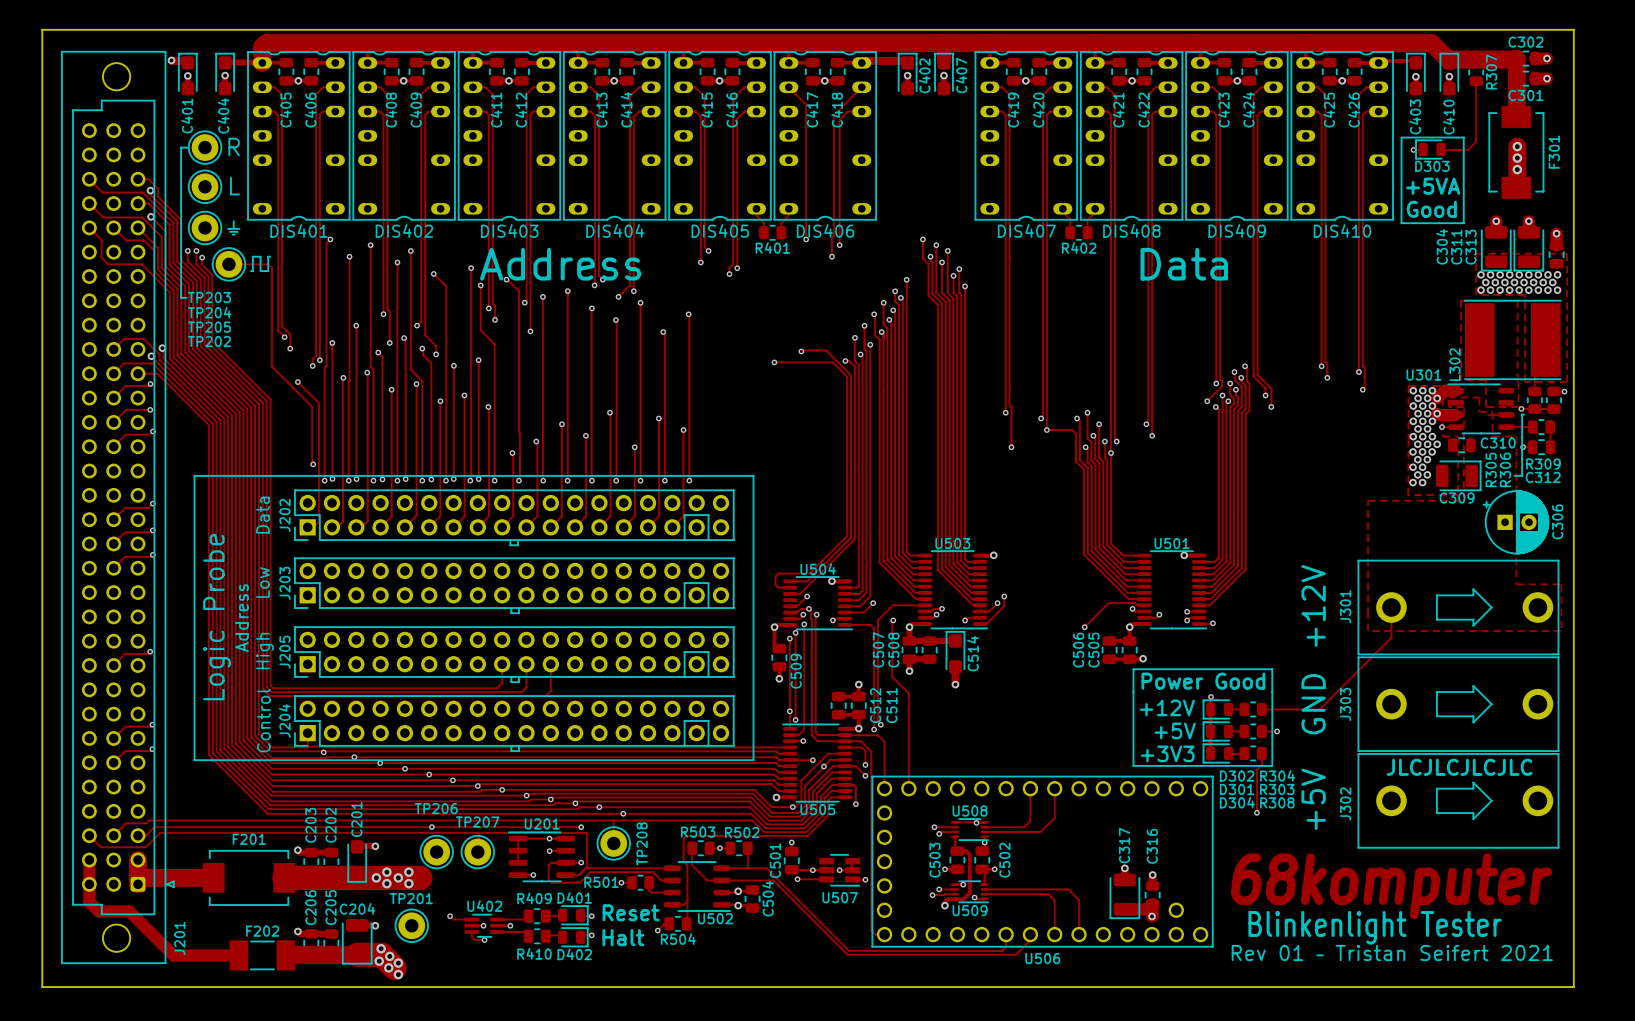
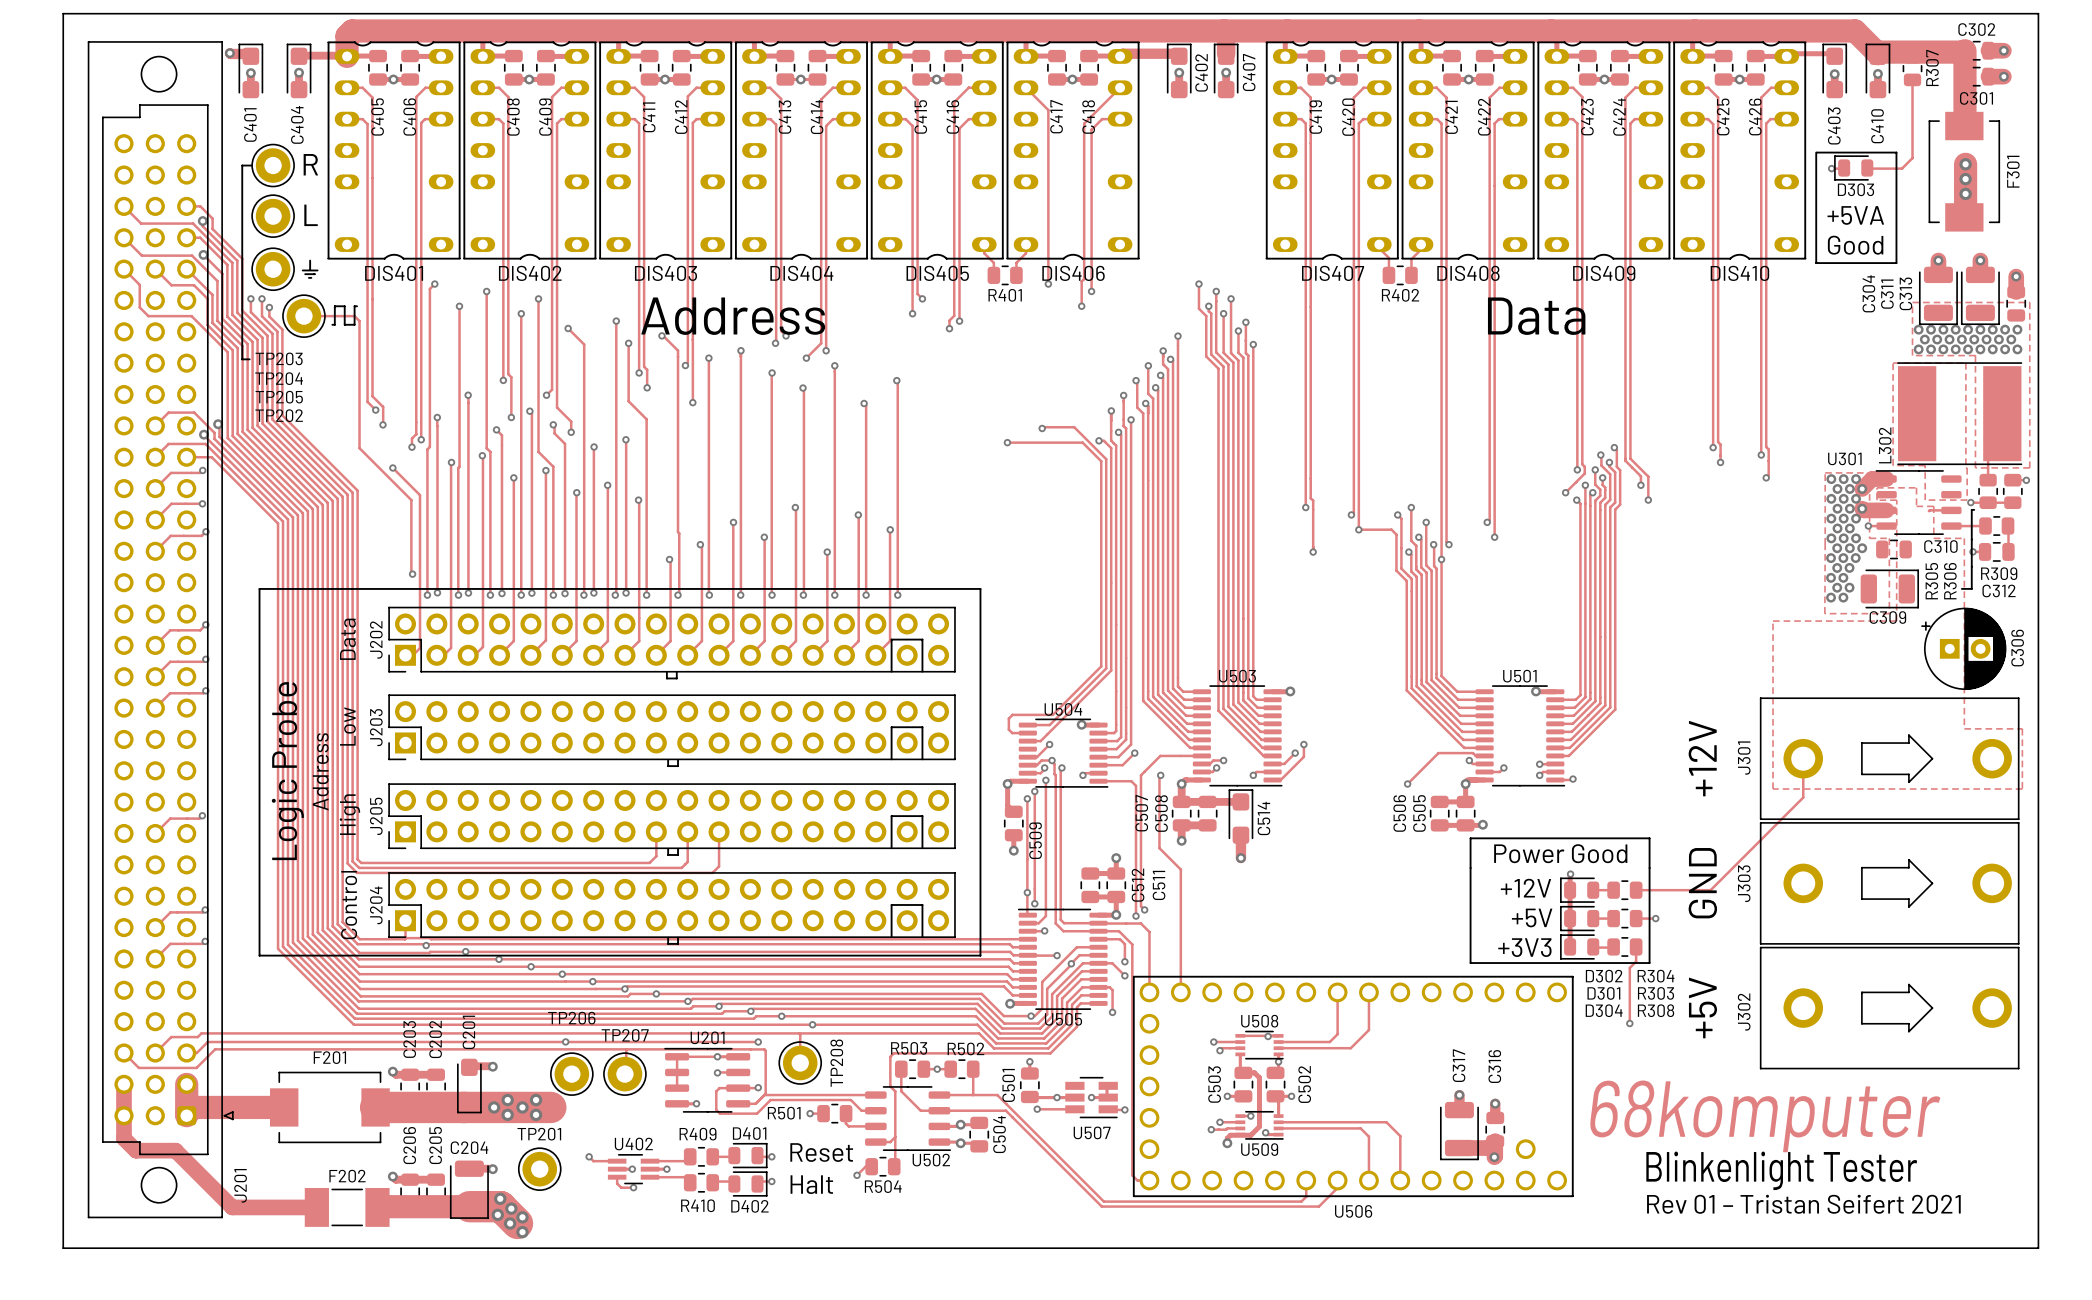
text: JLCJLCJLCJLC (1459, 767) -> none

